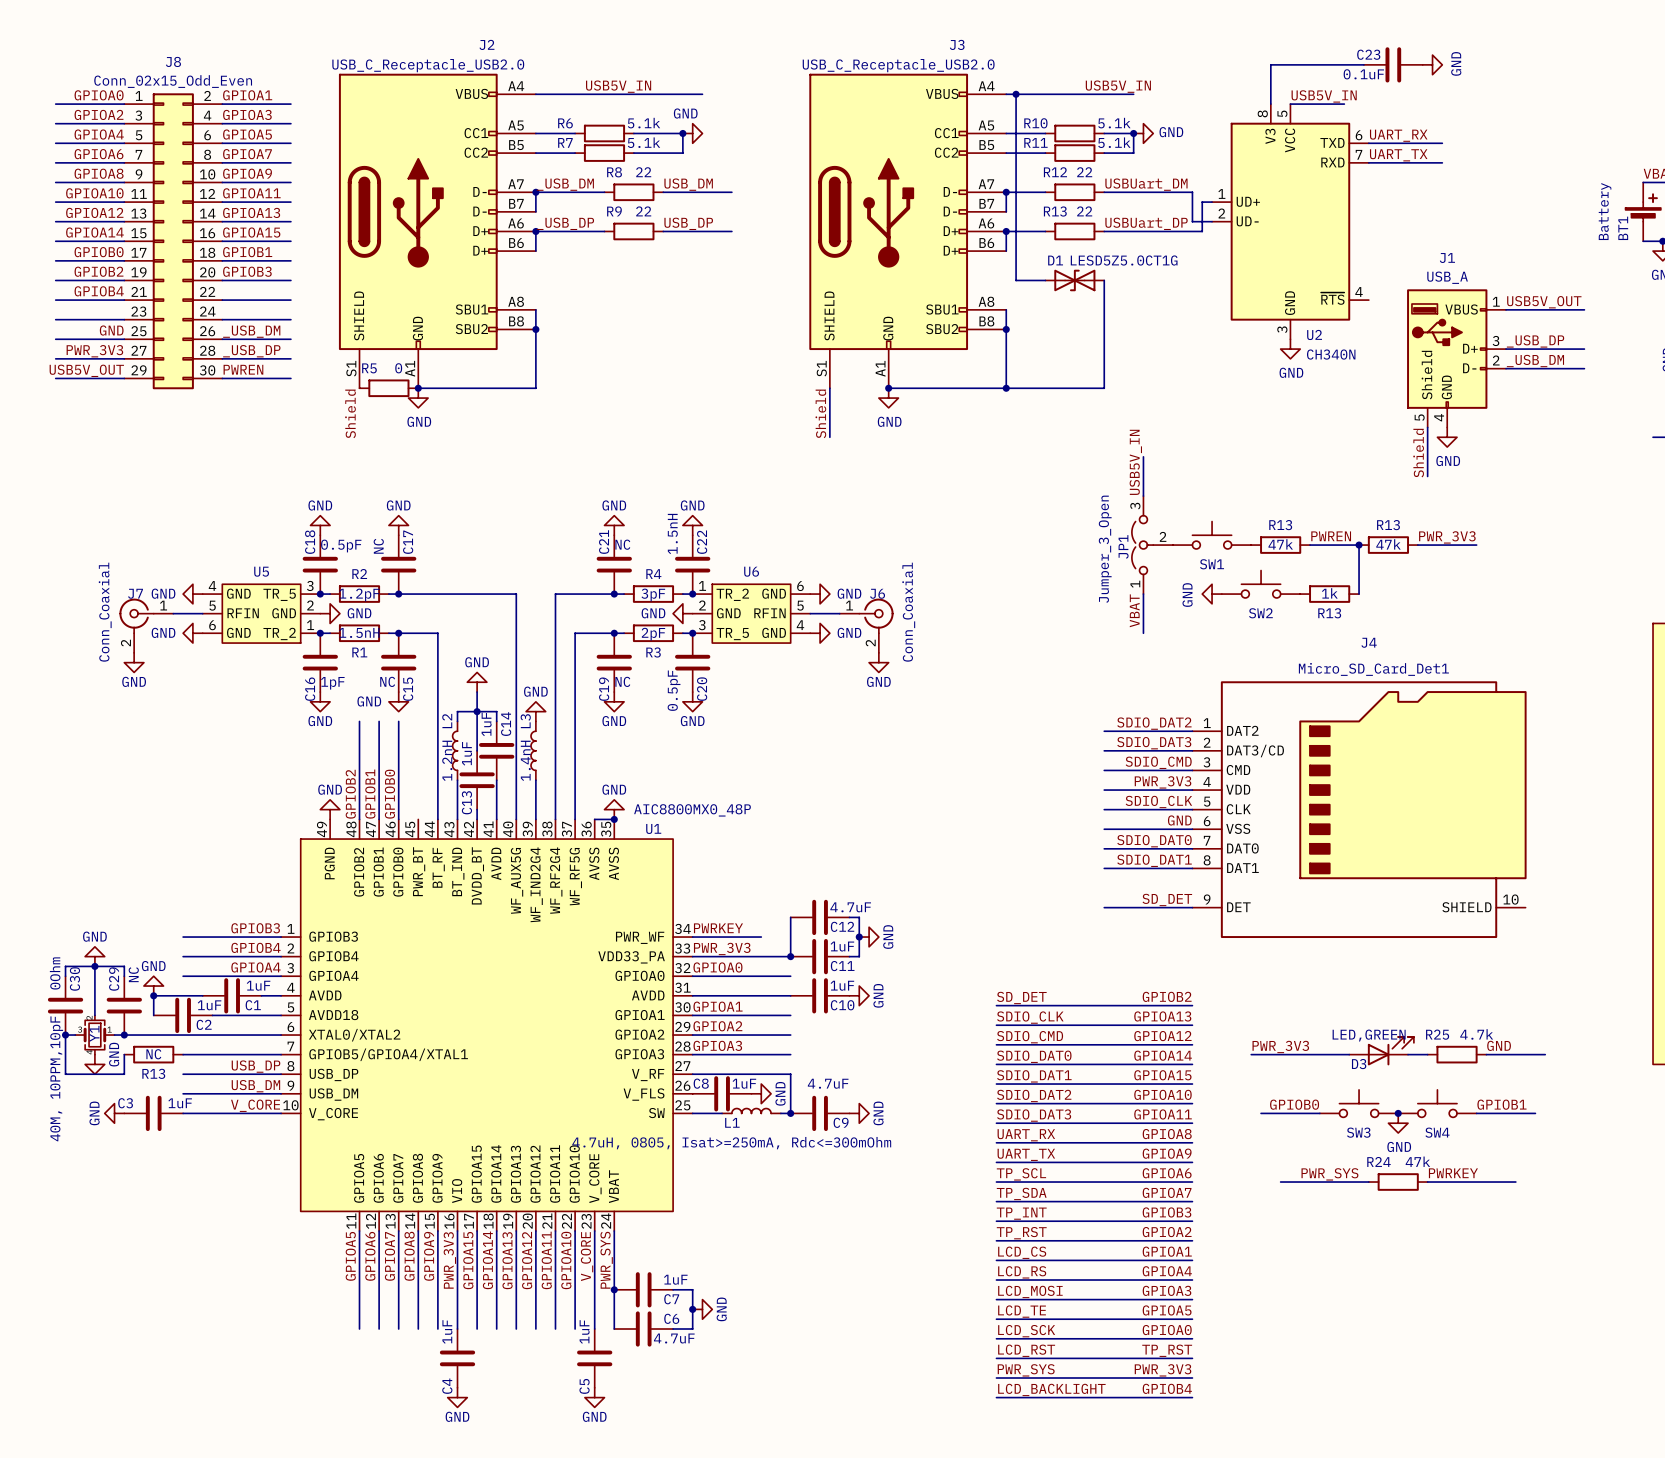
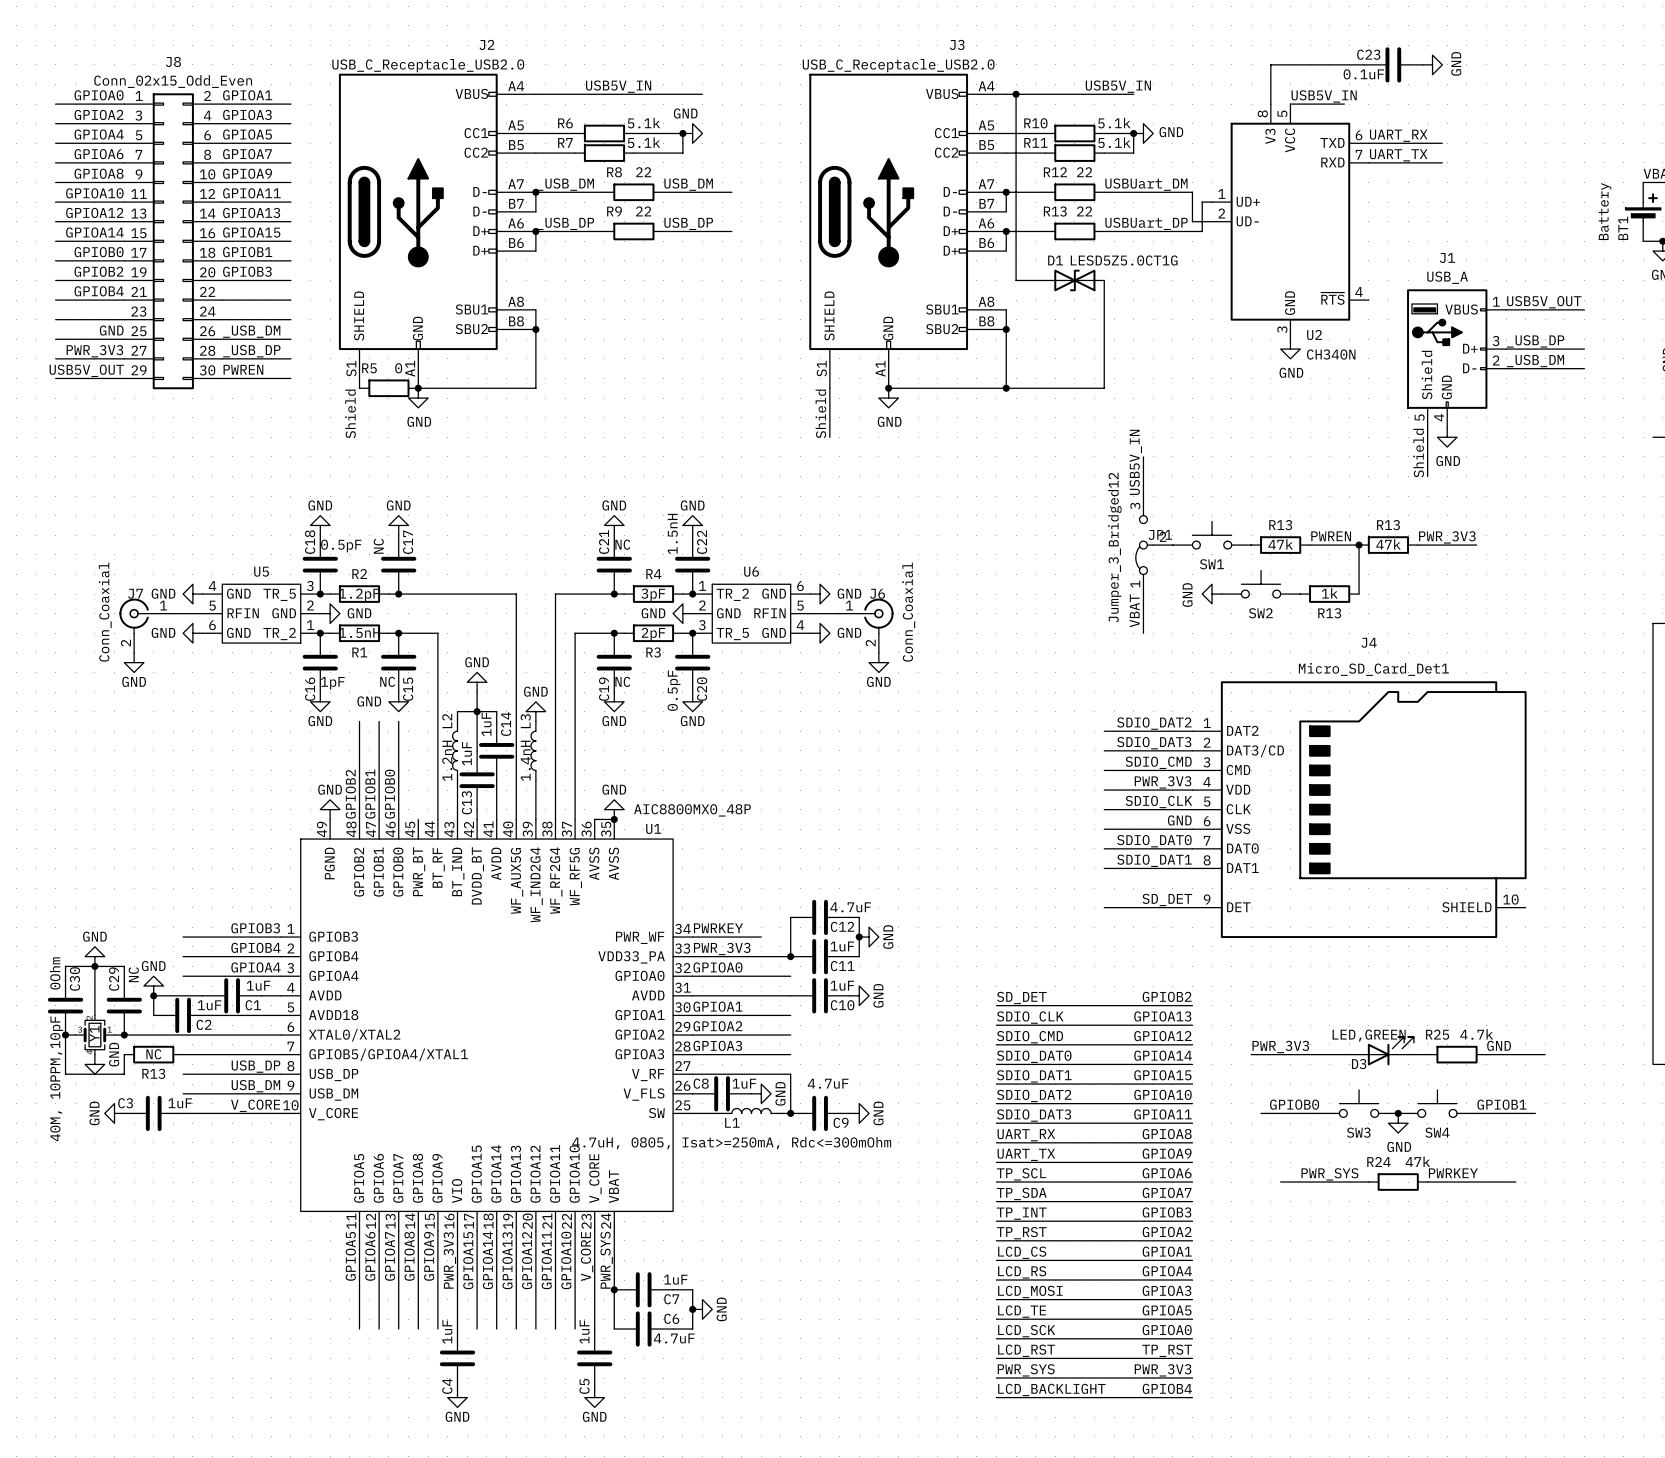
JP1 symbol: [1131, 496, 1173, 595] -> [1135, 496, 1173, 595]
JP1 name position: JP1 (1123, 546) -> JP1 (1160, 534)
JP1 value: Jumper_3_Open (1105, 549) -> Jumper_3_Bridged12 (1114, 547)

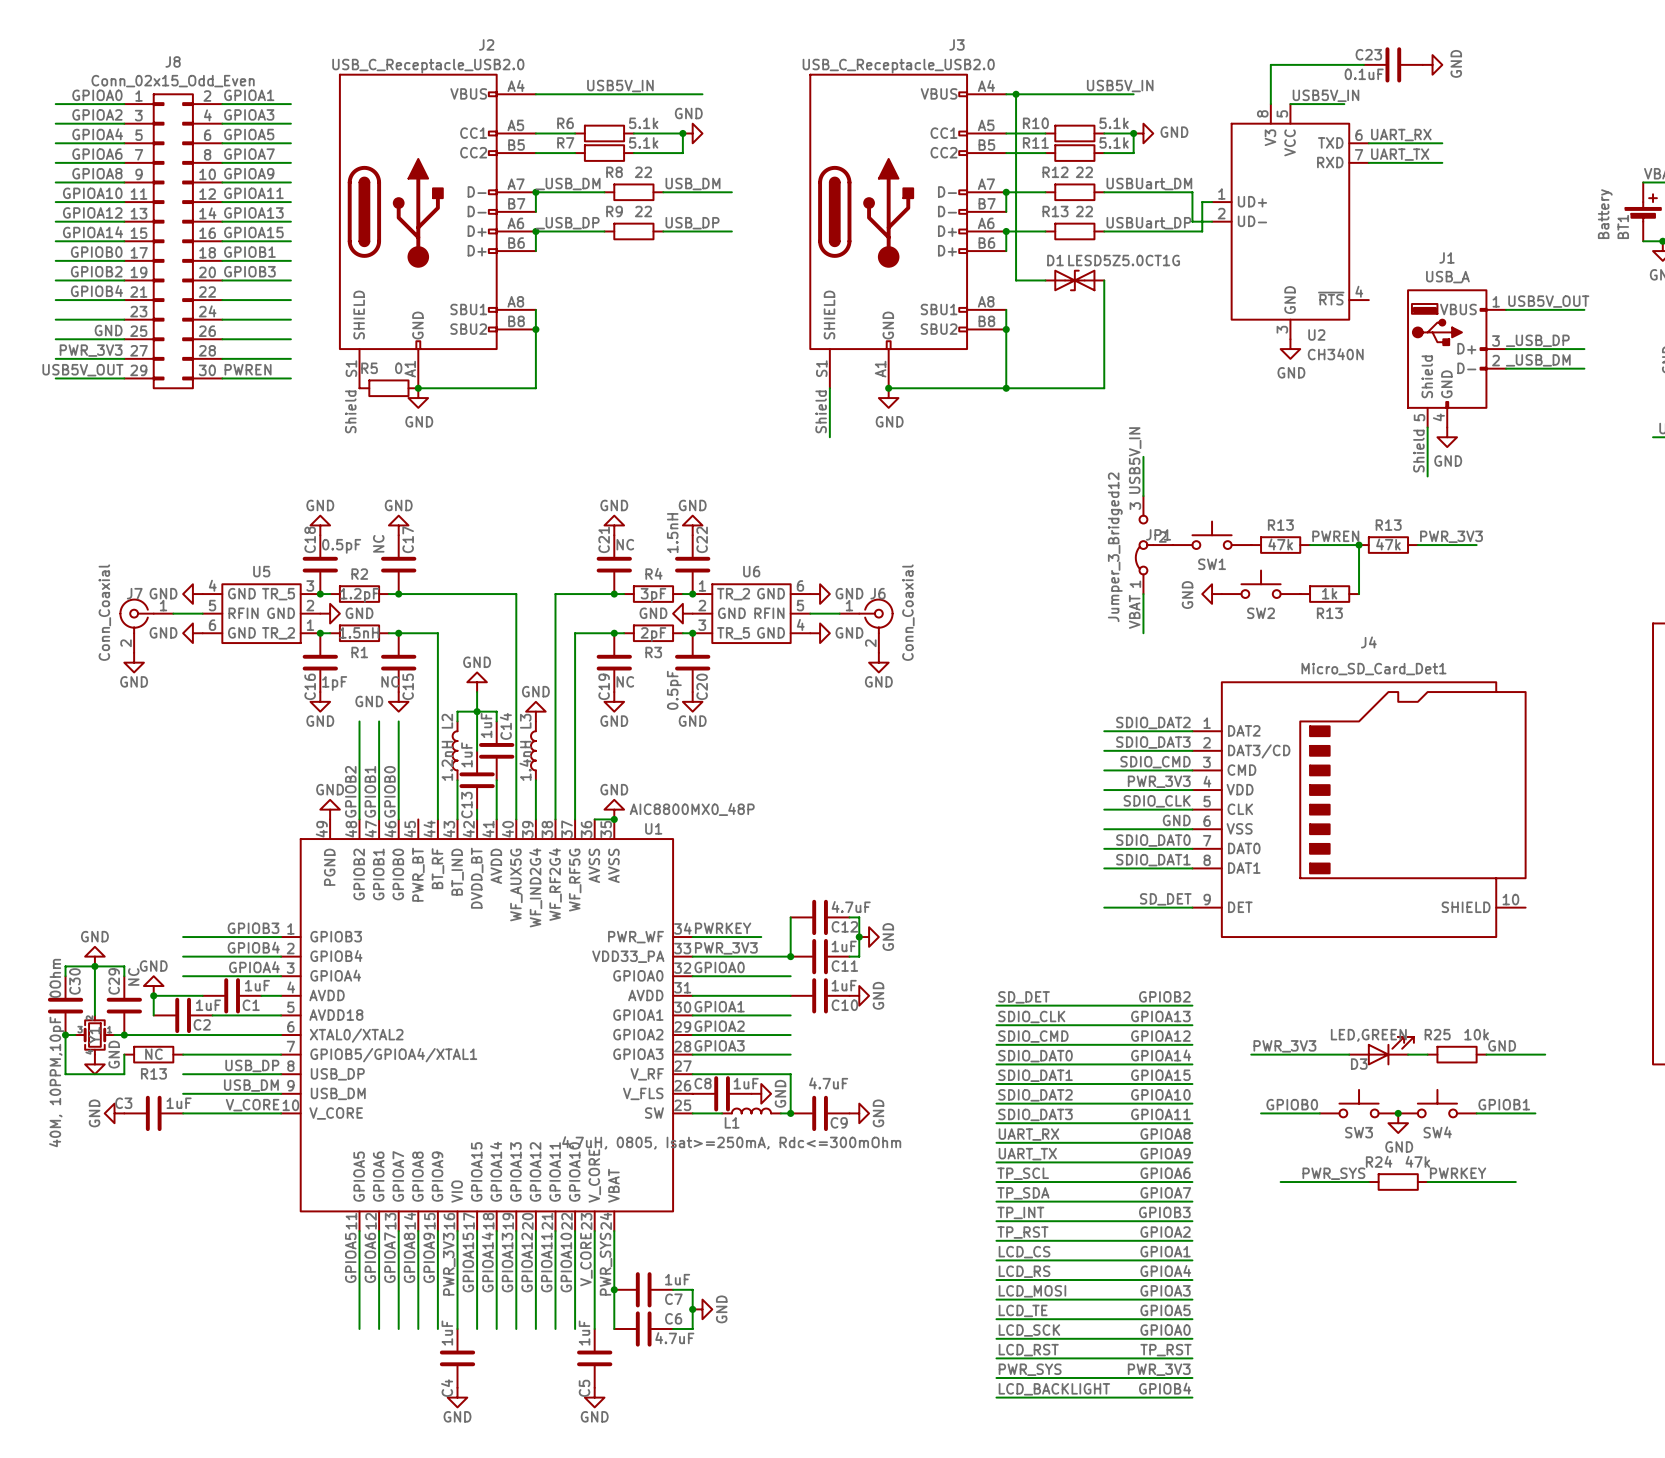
label: _USB_DM (251, 331) -> none
label: _USB_DP (251, 351) -> none
R25 value: 4.7k (1476, 1034) -> 10k (1476, 1034)

